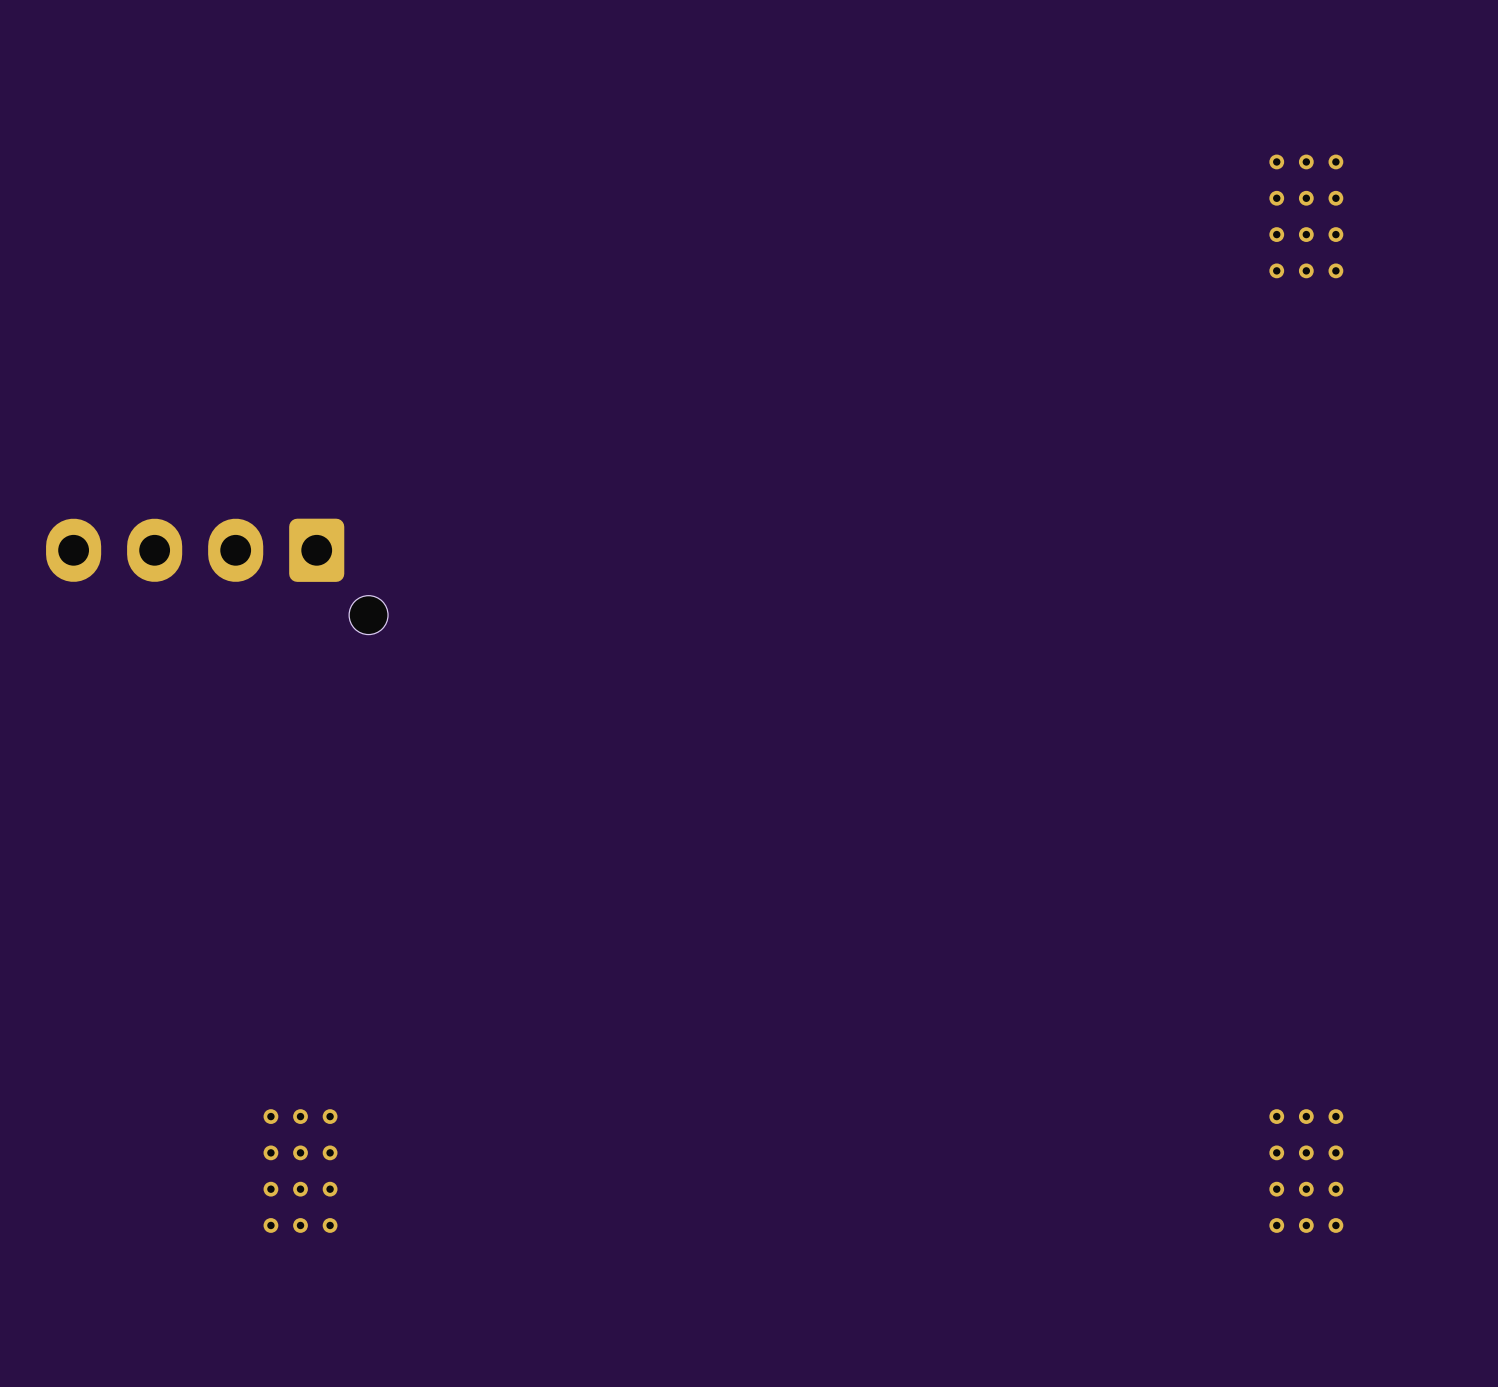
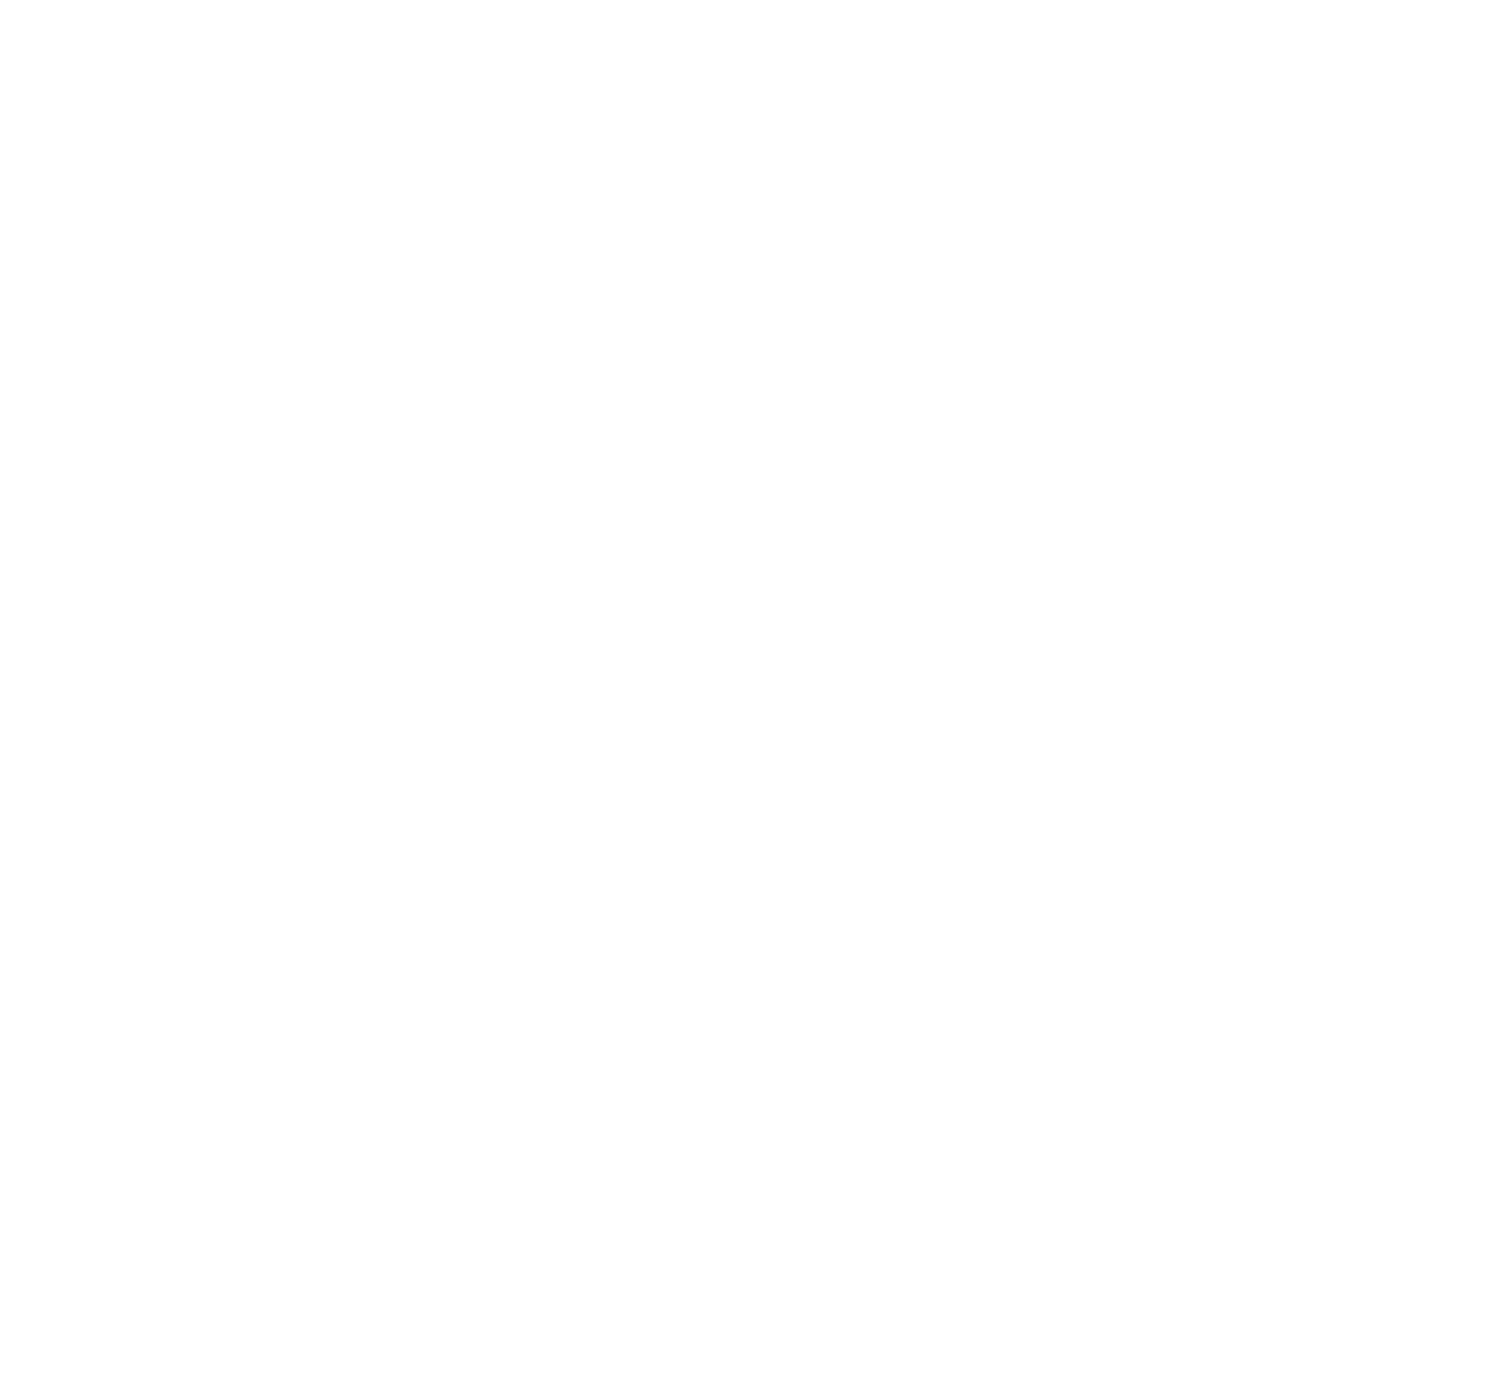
part: (1306, 216) -> none
part: (217, 576) -> none
part: (300, 1171) -> none
part: (1306, 1171) -> none

